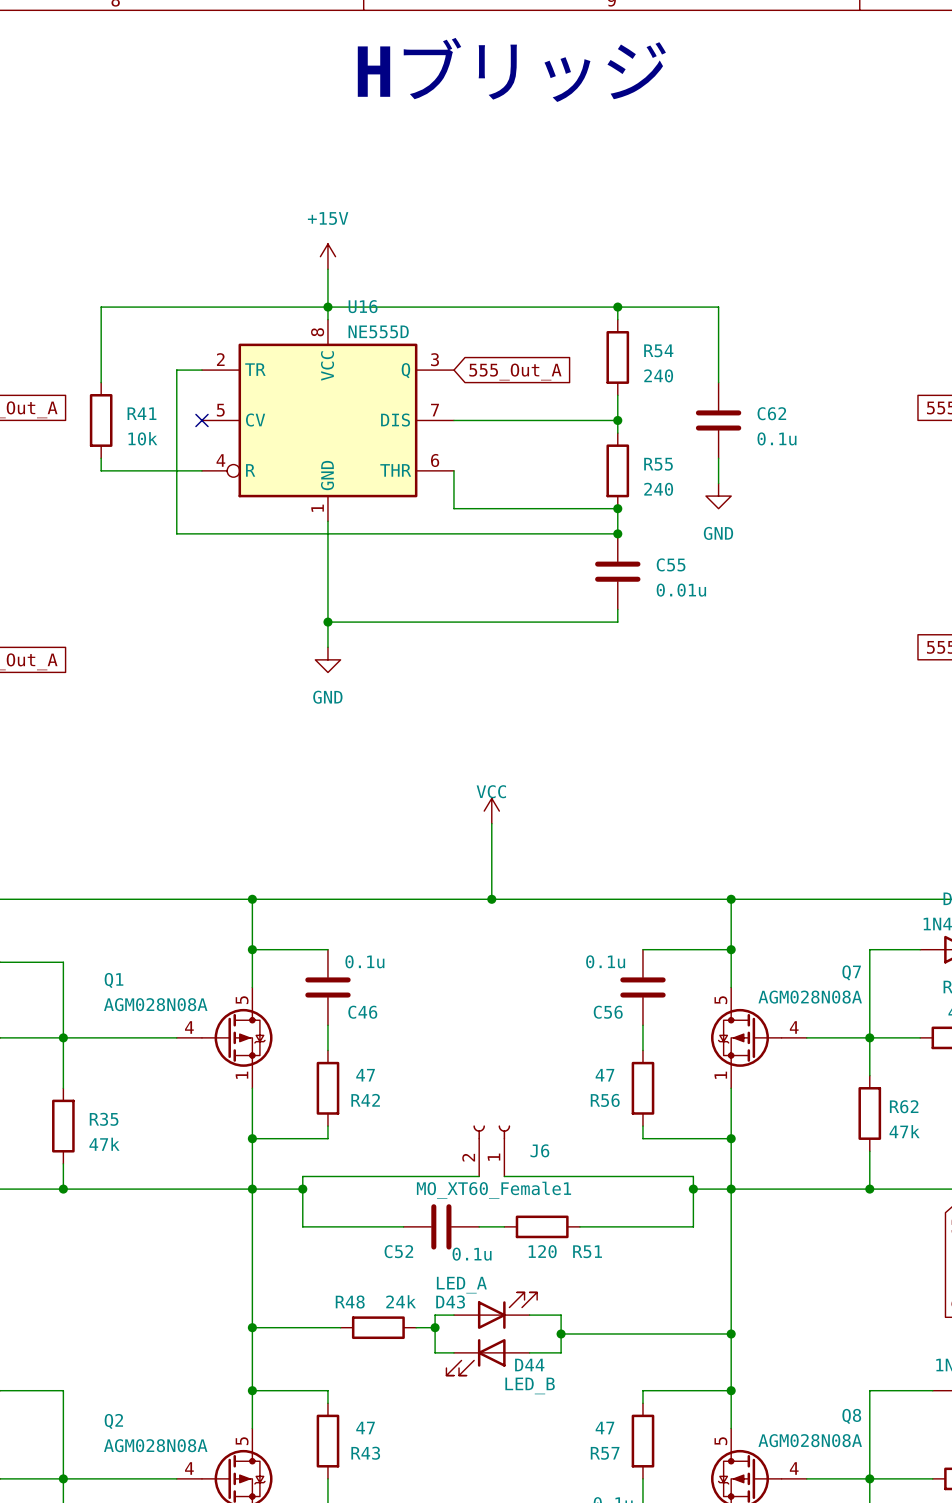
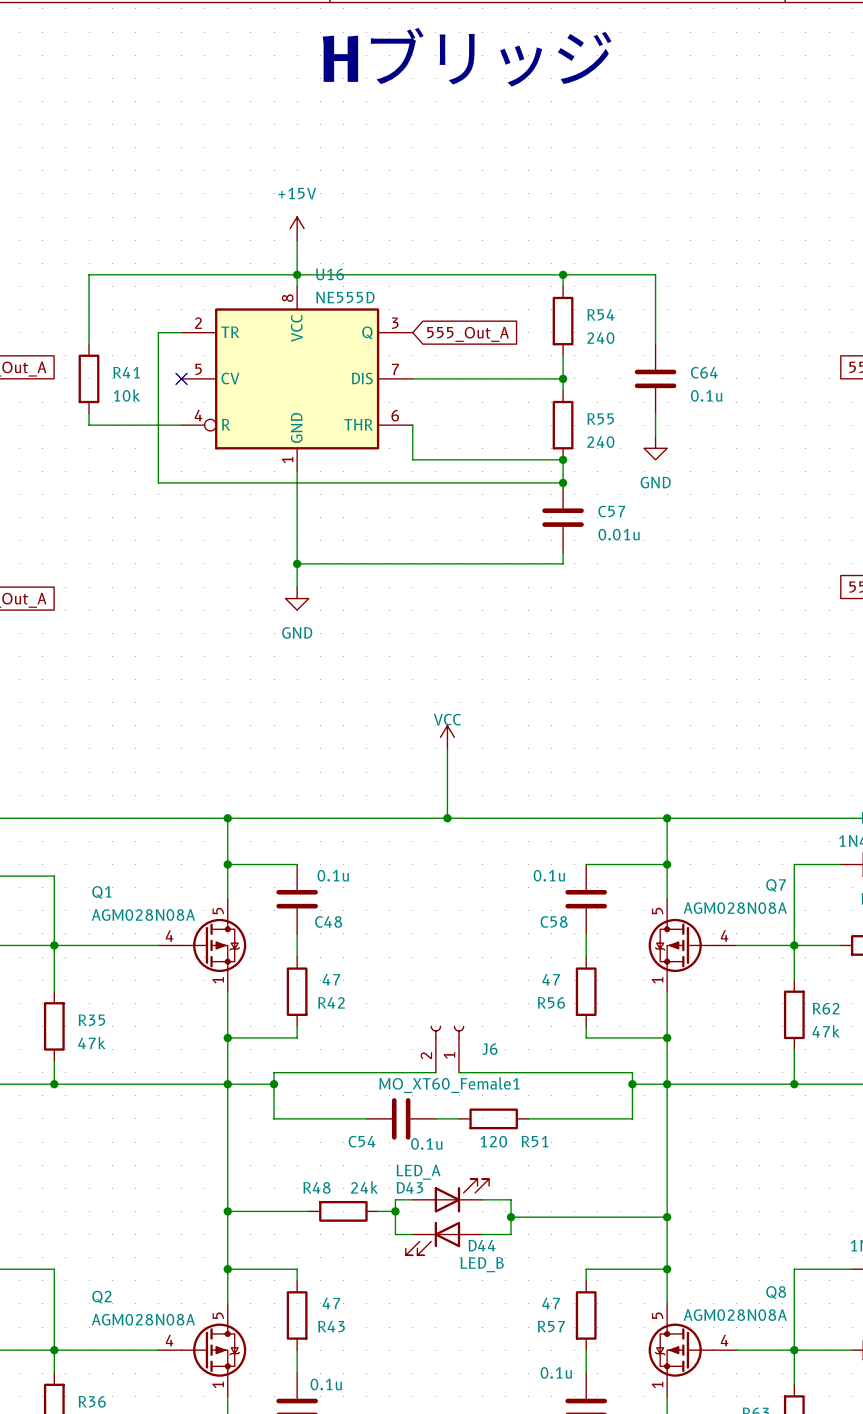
C62 name: C62 (771, 413) -> C64 (704, 372)
C55 name: C55 (671, 564) -> C57 (611, 511)
C46 name: C46 (362, 1012) -> C48 (328, 921)
C56 name: C56 (608, 1012) -> C58 (554, 921)
C52 name: C52 (398, 1251) -> C54 (362, 1141)

